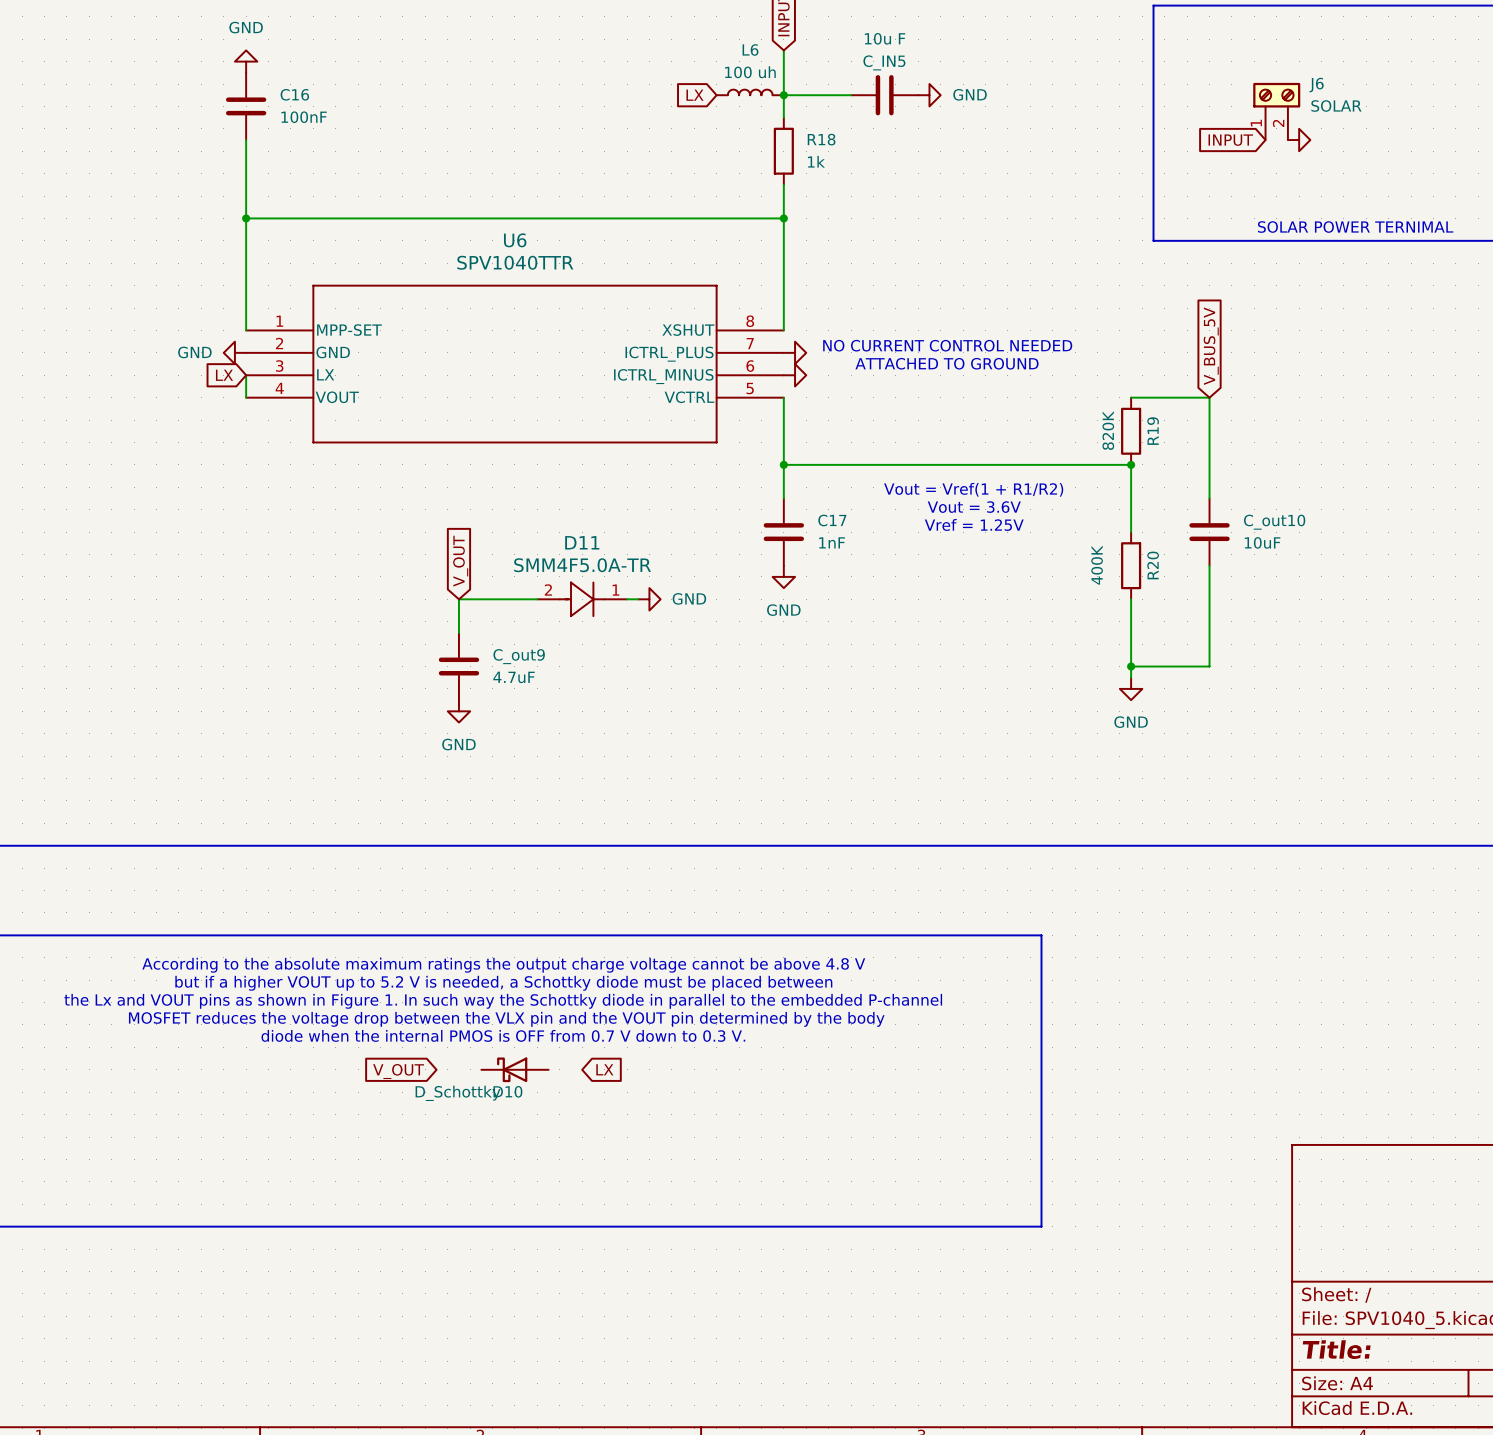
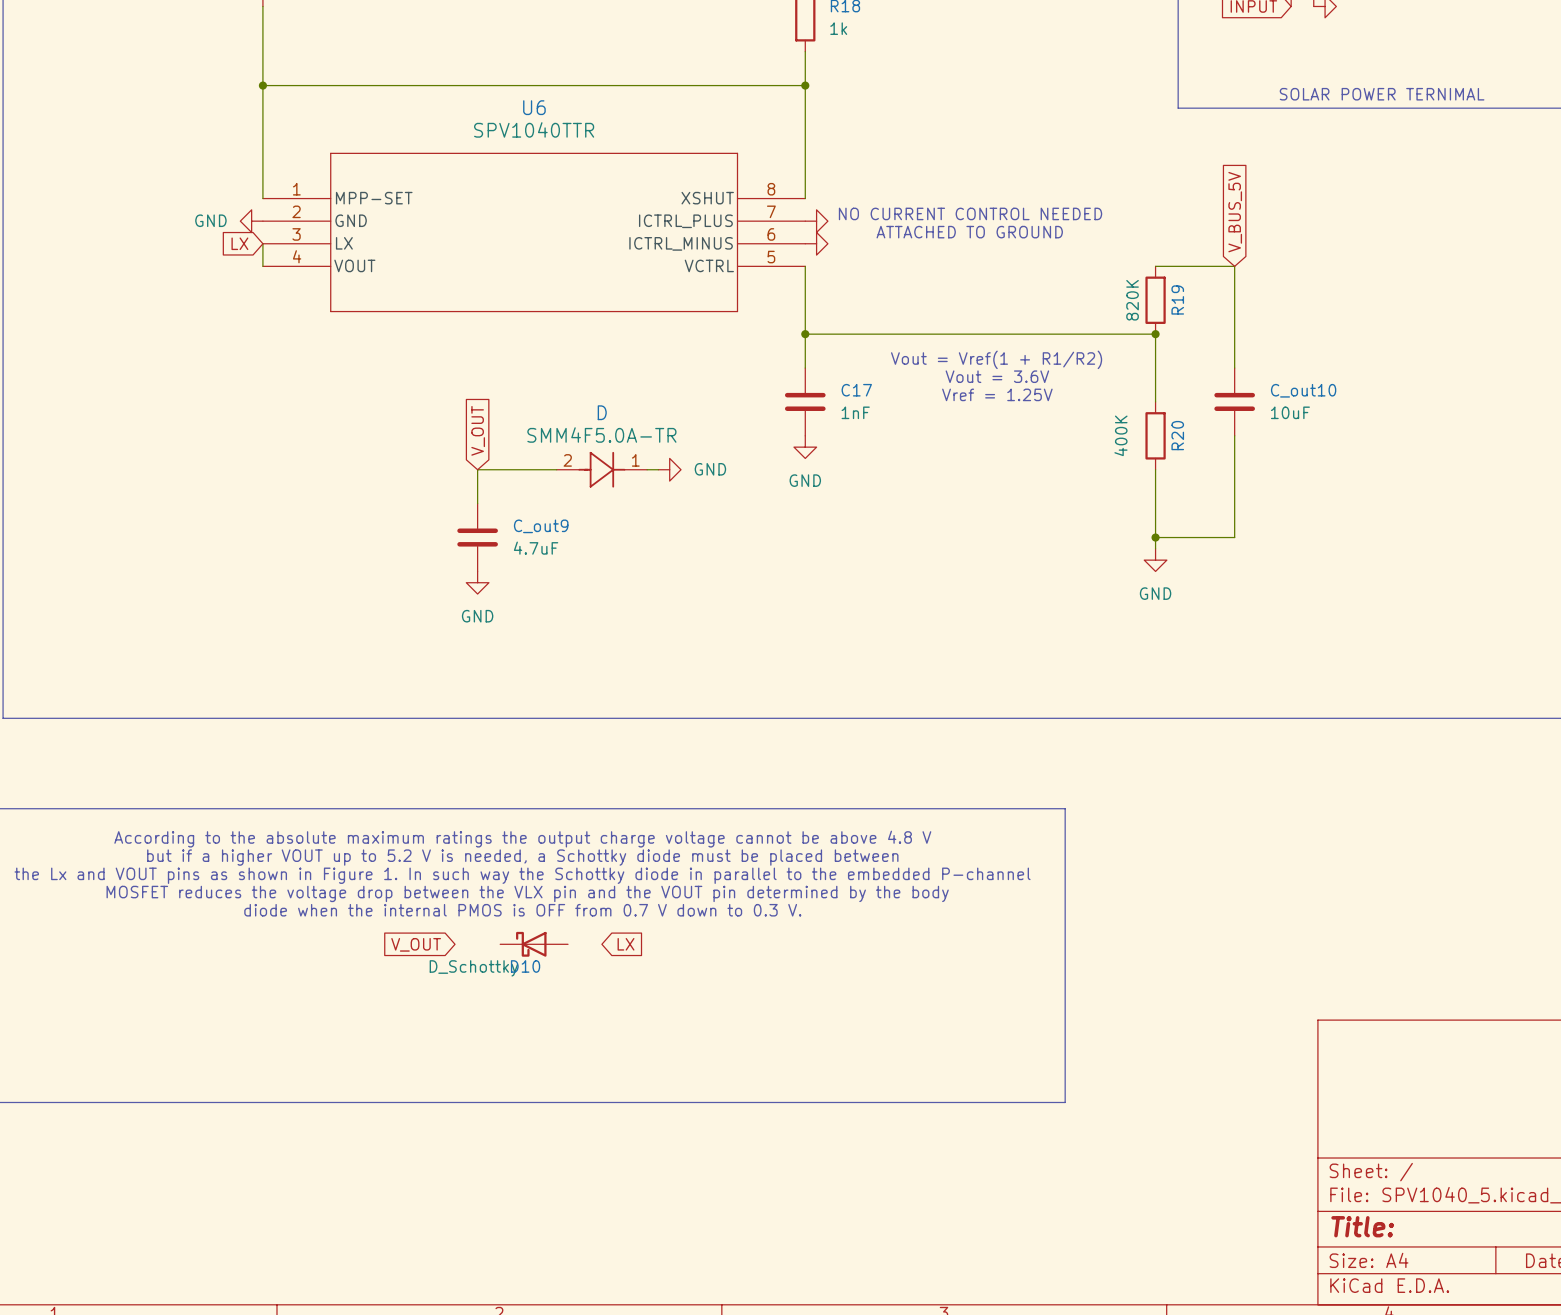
D11 name: D11 (582, 542) -> D (602, 412)

